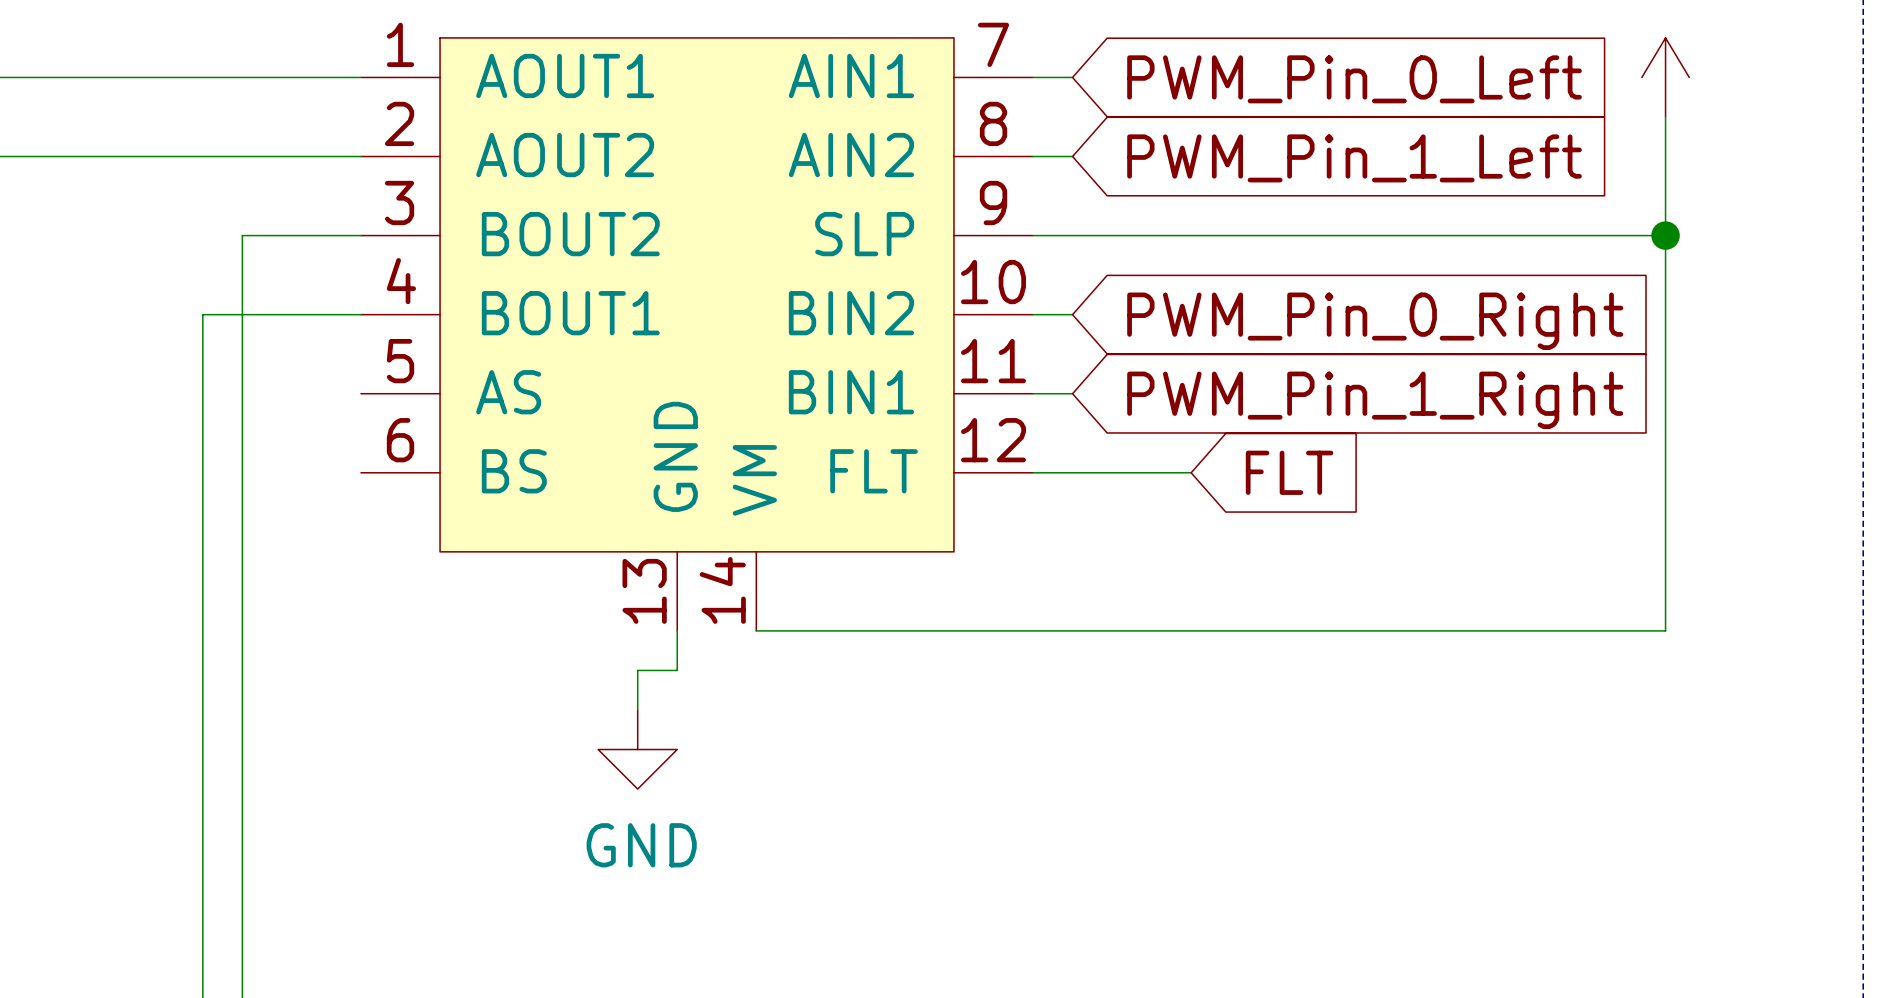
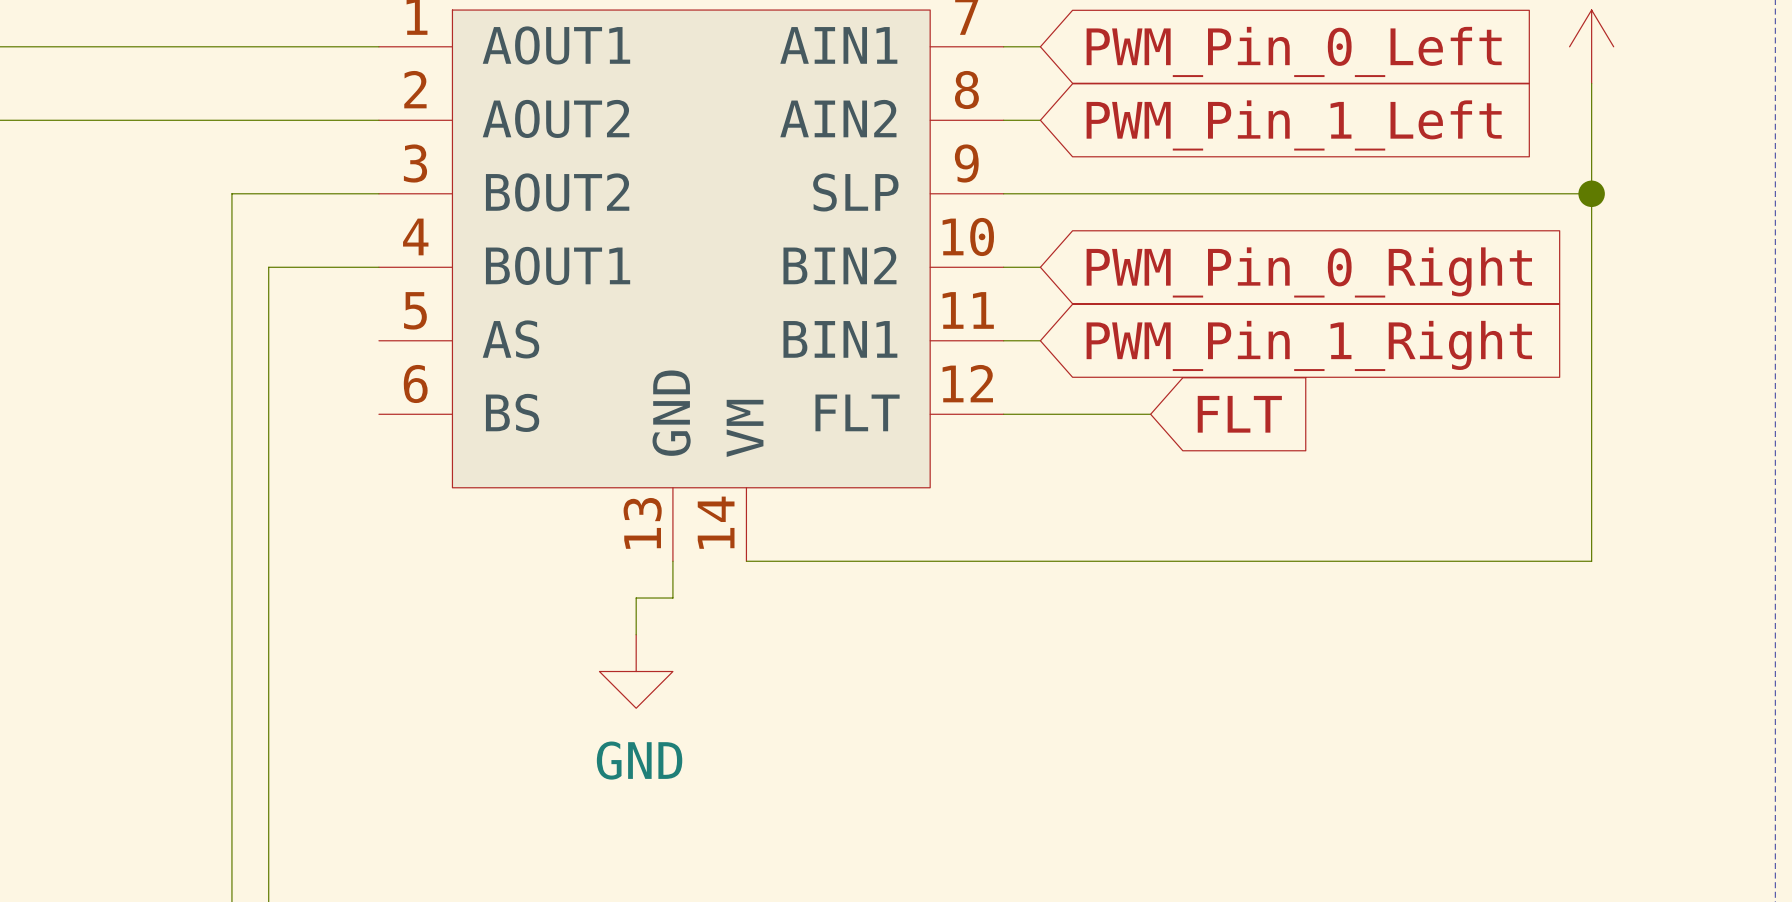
wire: (242, 235) (242, 314) (202, 314) -> (268, 193) (231, 193) (231, 267)

